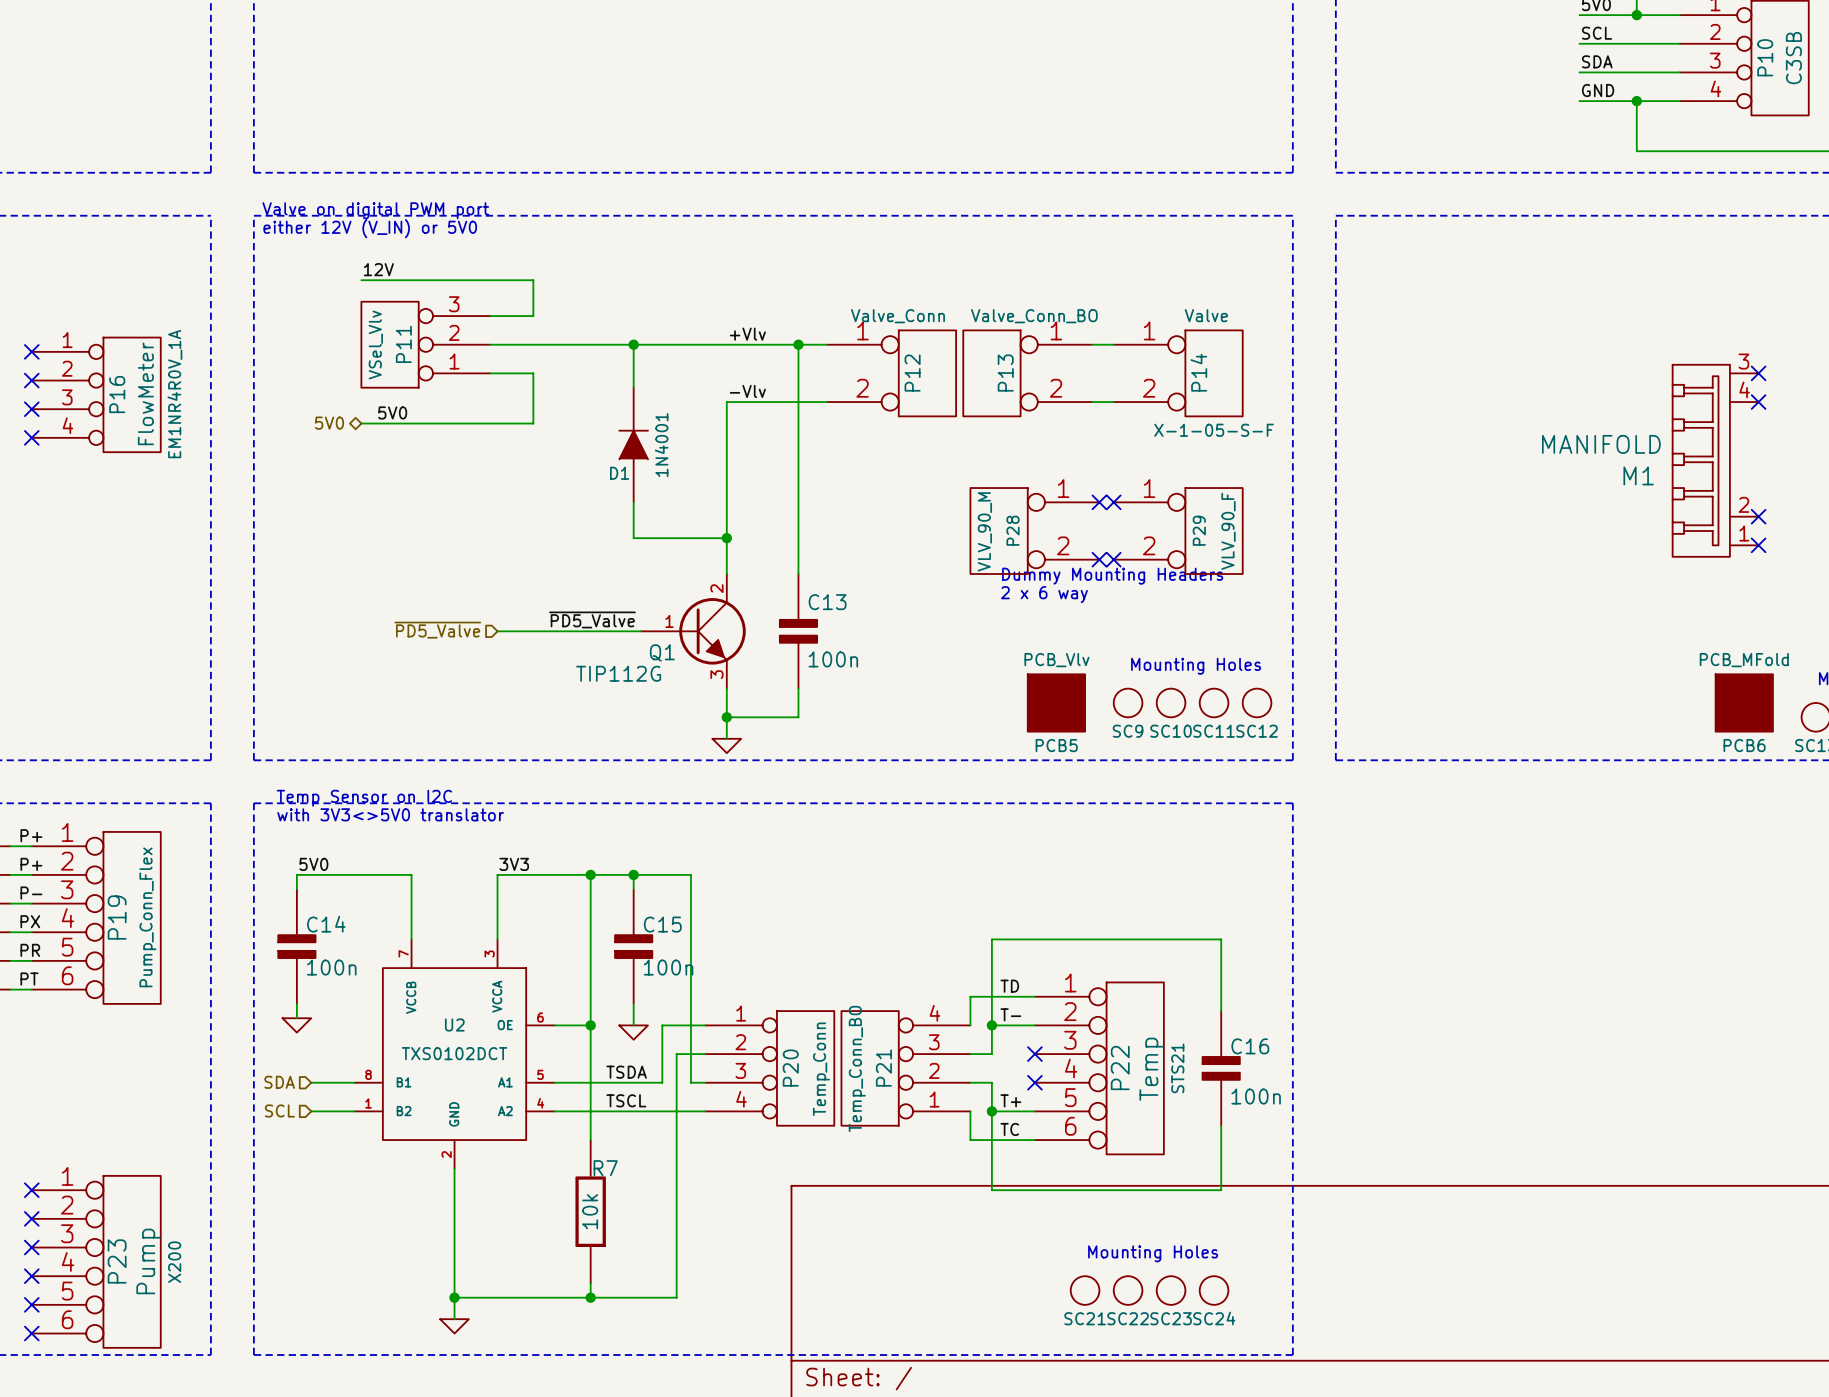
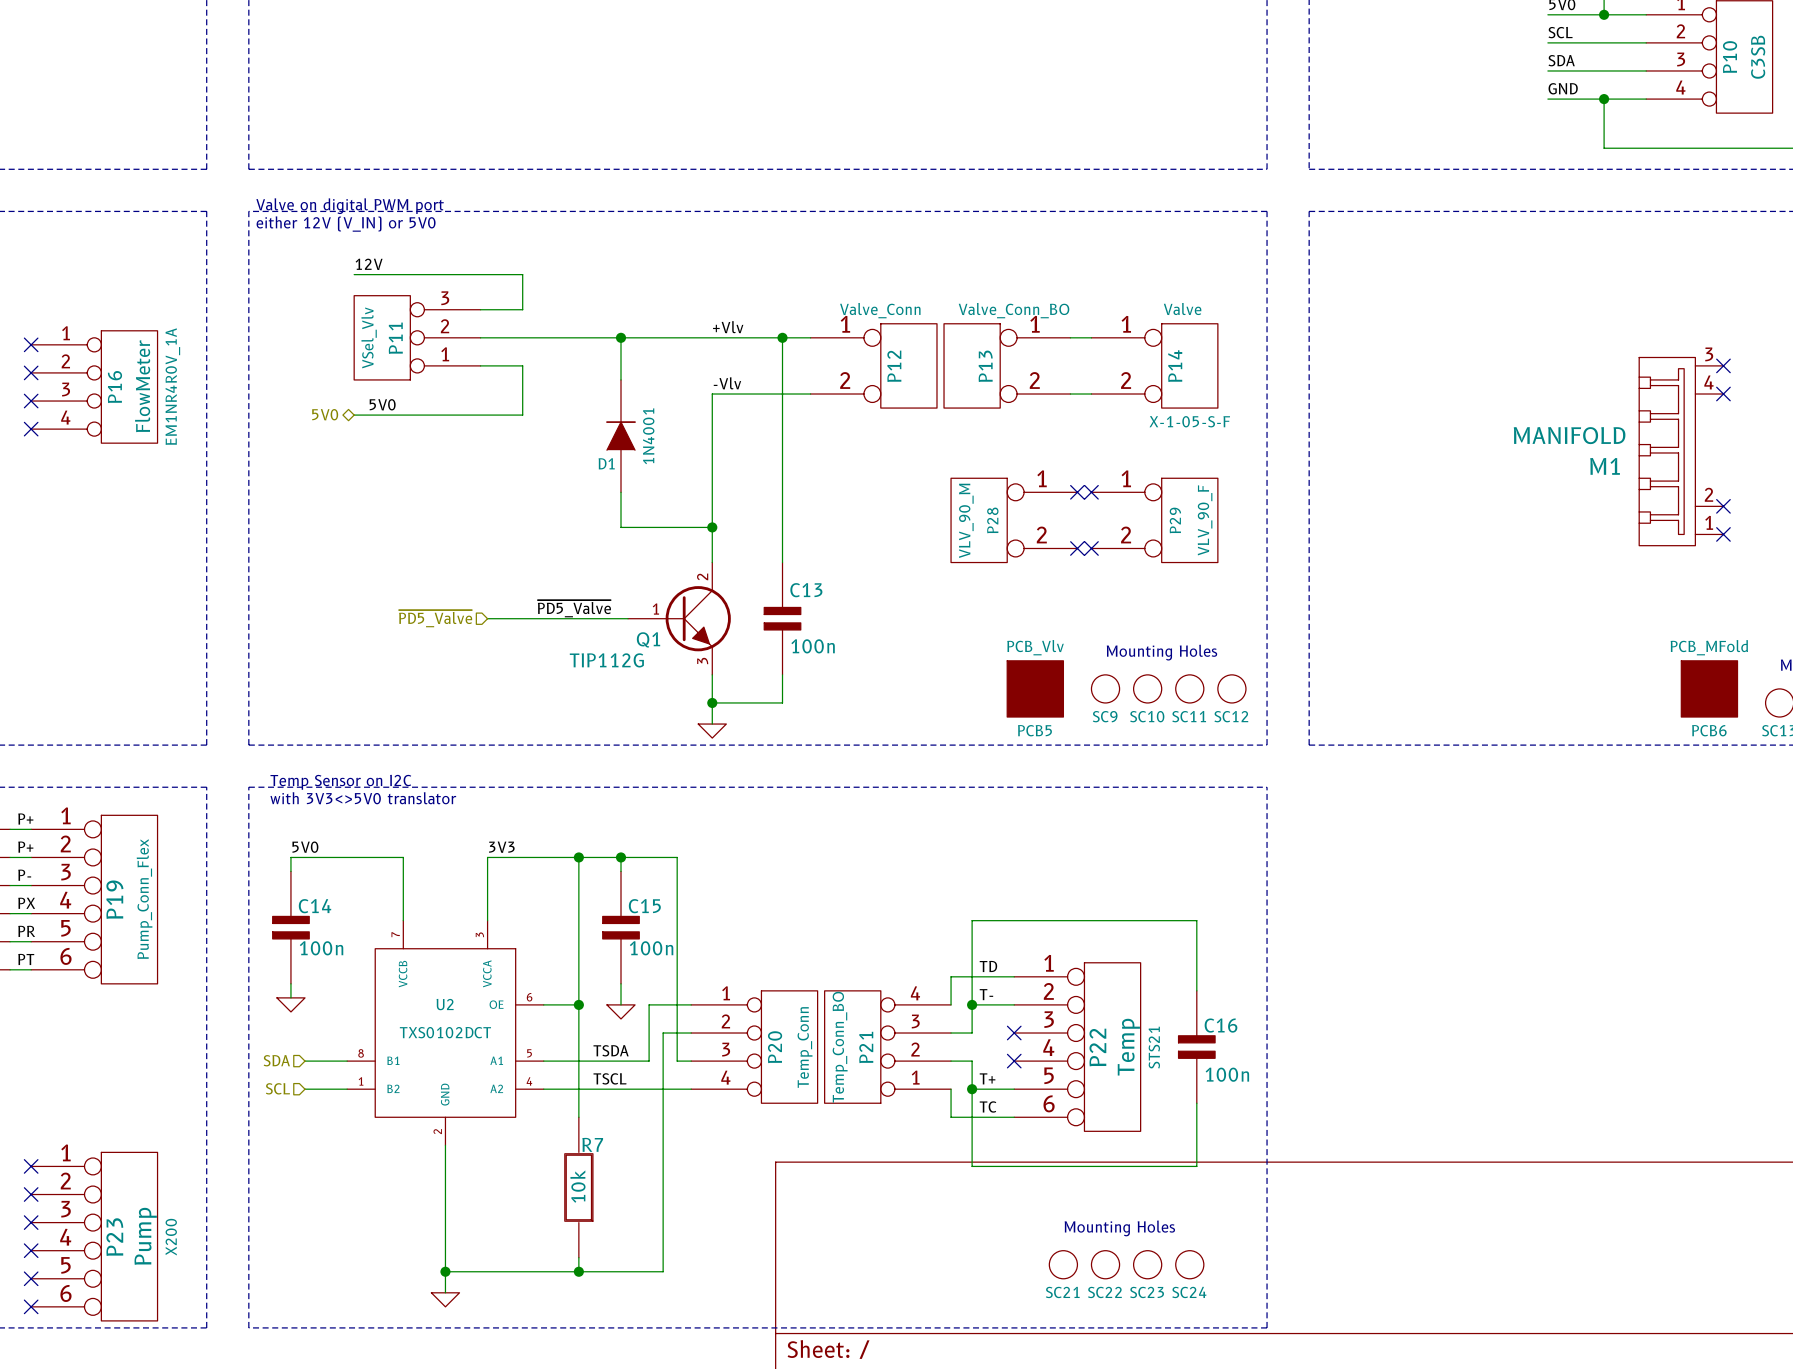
text: Dummy Mounting Headers (1112, 576) -> none
text: 2 x 6 way (1044, 594) -> none

